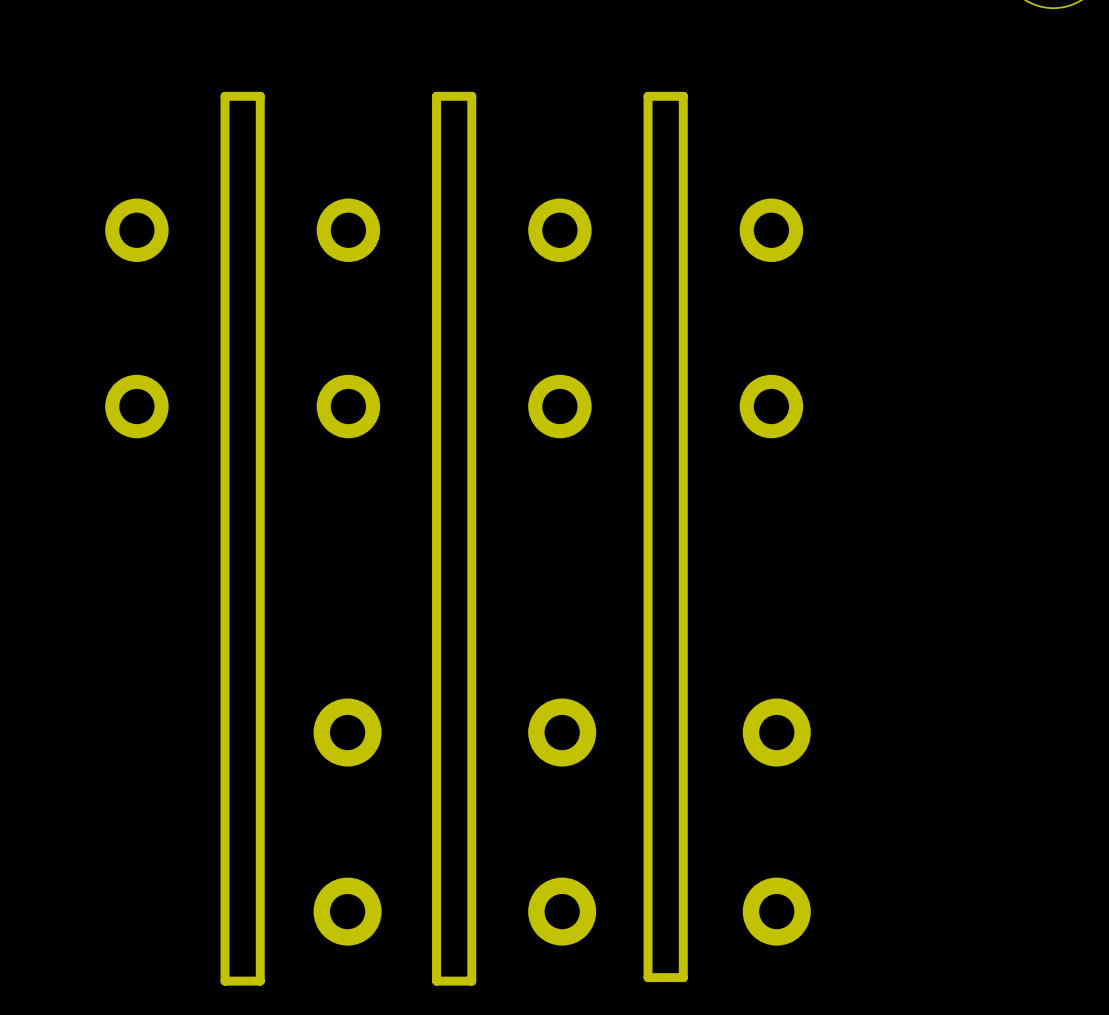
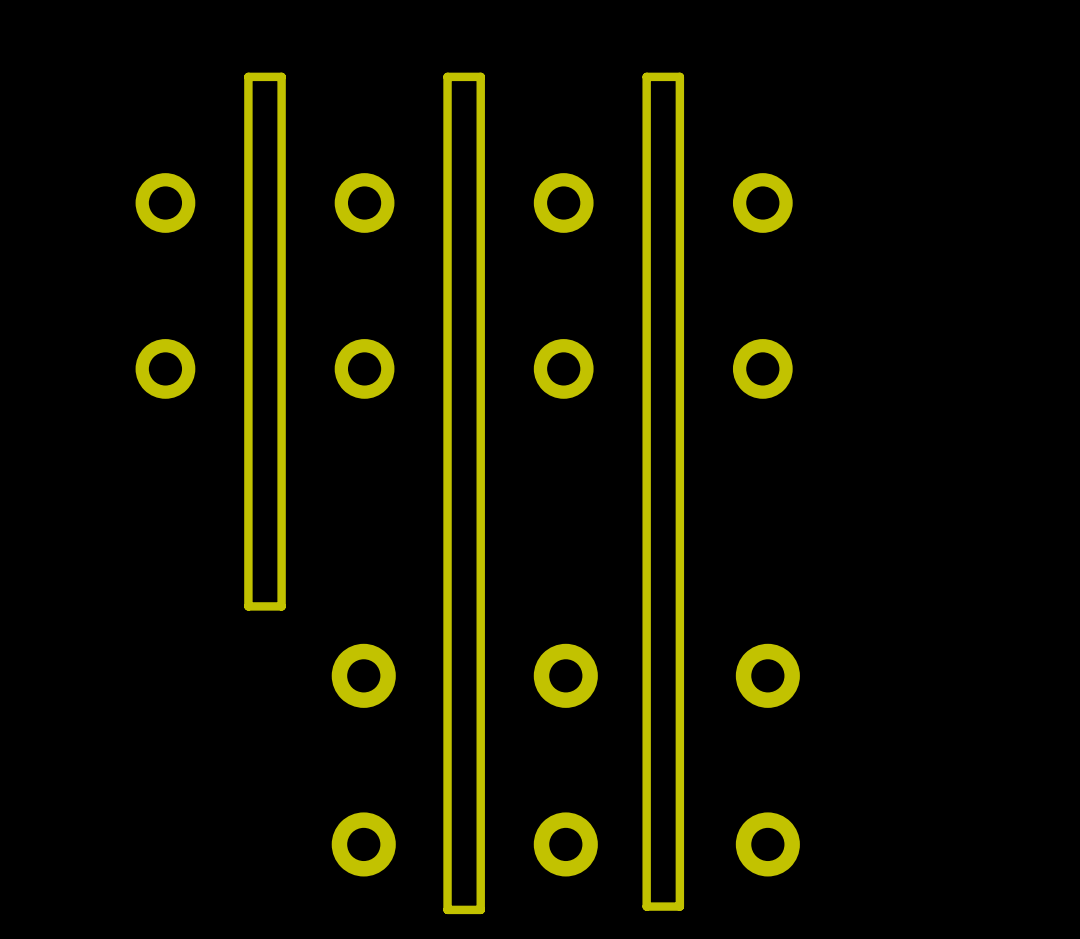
board edge: (260, 658) (260, 981) (225, 981) (225, 658) -> (281, 606) (248, 606)

